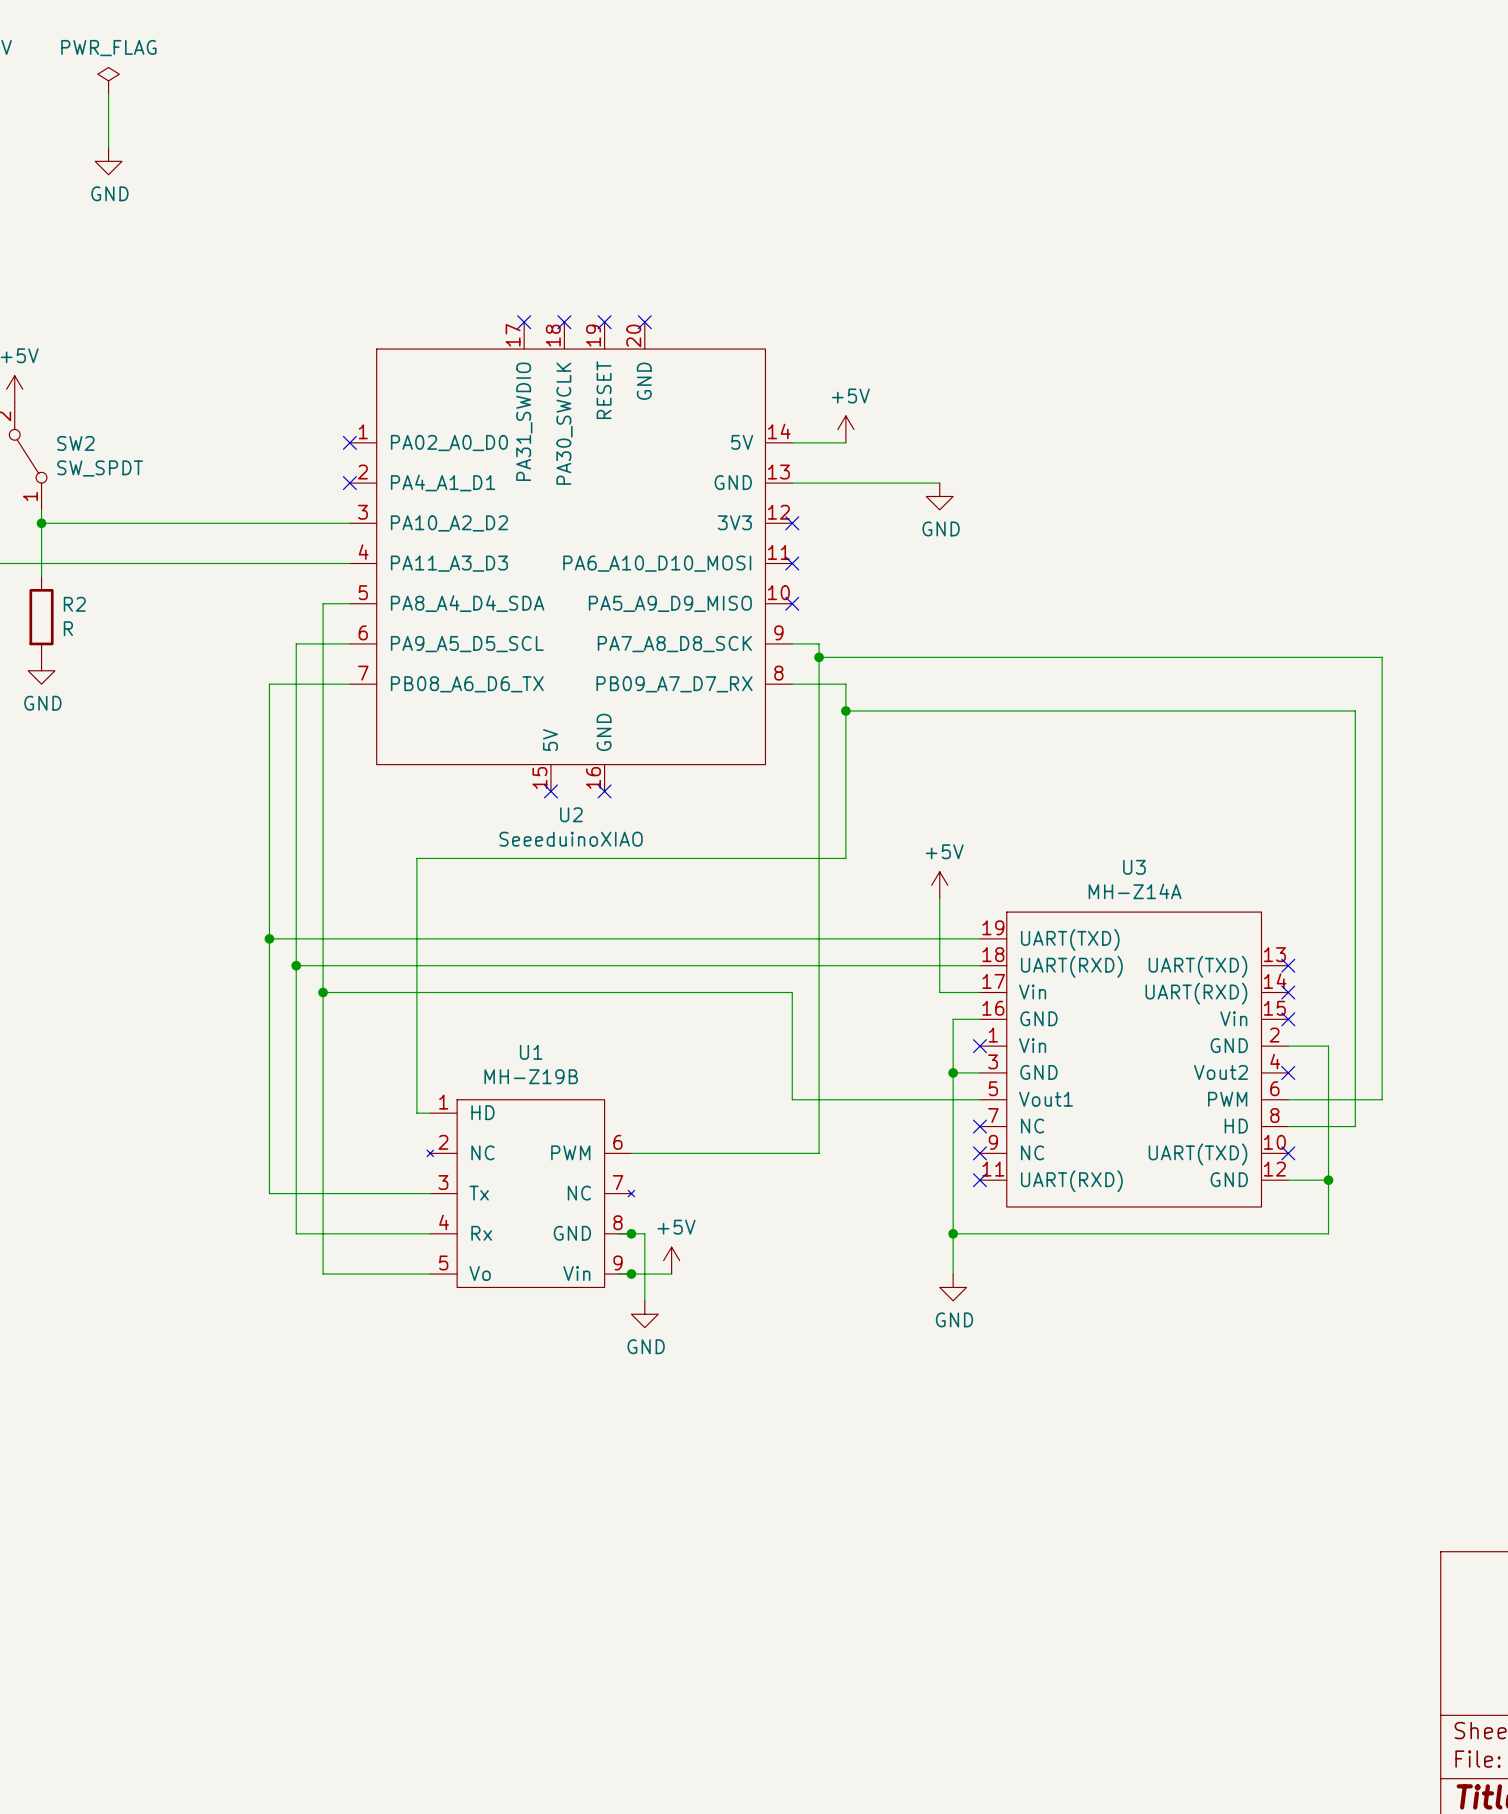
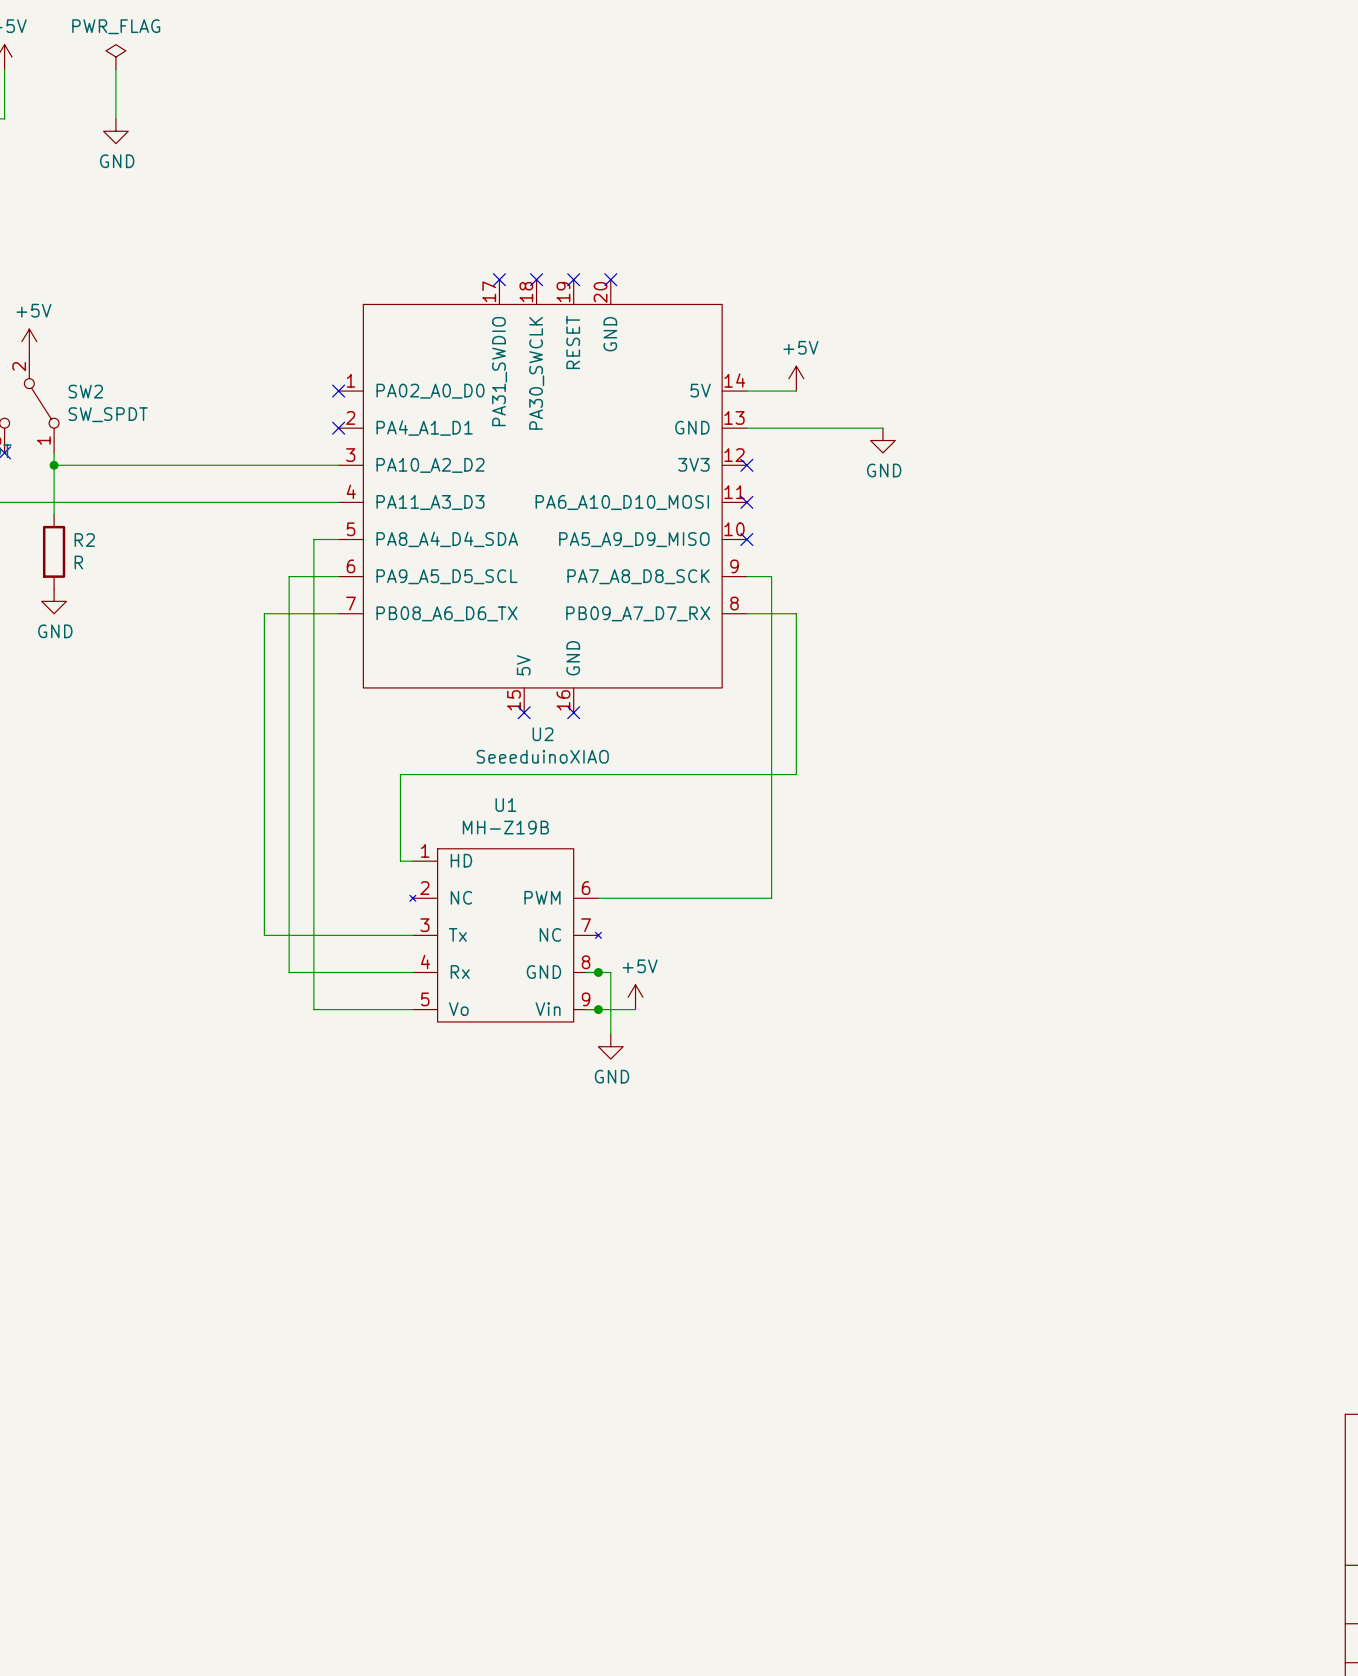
wire: (819, 657) (1382, 657) (1382, 1099) (1288, 1099) -> none
junction: (819, 657) -> none
wire: (845, 710) (1355, 710) (1355, 1126) (1288, 1126) -> none
junction: (845, 710) -> none
power symbol: +5V (939, 885) -> none
wire: (939, 898) (939, 992) (979, 992) -> none
wire: (269, 938) (979, 938) -> none
junction: (269, 938) -> none
wire: (416, 952) (416, 1113) -> (400, 861) (412, 861)
wire: (296, 965) (979, 965) -> none
junction: (296, 965) -> none
no-connect mark: (1288, 965) -> none
wire: (323, 992) (631, 992) -> none
junction: (323, 992) -> none
wire: (792, 992) (792, 1099) (979, 1099) -> (746, 898) (771, 898)
wire: (819, 992) (819, 1153) (631, 1153) -> none
no-connect mark: (1288, 992) -> none
wire: (979, 1019) (953, 1019) (953, 1274) -> none
no-connect mark: (1288, 1019) -> none
wire: (269, 1032) (269, 1193) (430, 1193) -> (264, 935) (412, 935)
no-connect mark: (979, 1046) -> none
wire: (1288, 1046) (1328, 1046) (1328, 1233) (953, 1233) -> none
U3: MH-Z14A (1134, 1059) -> none
wire: (296, 1072) (296, 1233) (430, 1233) -> (289, 972) (412, 972)
junction: none -> (598, 972)
wire: (953, 1072) (979, 1072) -> none
junction: (953, 1072) -> none
no-connect mark: (1288, 1072) -> none
wire: (323, 1113) (323, 1274) (430, 1274) -> (313, 1009) (400, 1009)
junction: none -> (598, 1009)
no-connect mark: (979, 1126) -> none
no-connect mark: (979, 1153) -> none
no-connect mark: (1288, 1153) -> none
no-connect mark: (979, 1180) -> none
wire: (1288, 1180) (1328, 1180) -> none
junction: (1328, 1180) -> none
U1 position: (530, 1193) -> (505, 935)
wire: (618, 1233) (644, 1233) (644, 1300) -> (586, 972) (610, 972) (610, 1034)
junction: (631, 1233) -> none
junction: (953, 1233) -> none
power symbol position: +5V (671, 1260) -> +5V (635, 997)
wire: (618, 1274) (671, 1274) -> (586, 1009) (635, 1009)
junction: (631, 1274) -> none
power symbol: GND (953, 1287) -> none
power symbol position: GND (644, 1314) -> GND (610, 1046)

